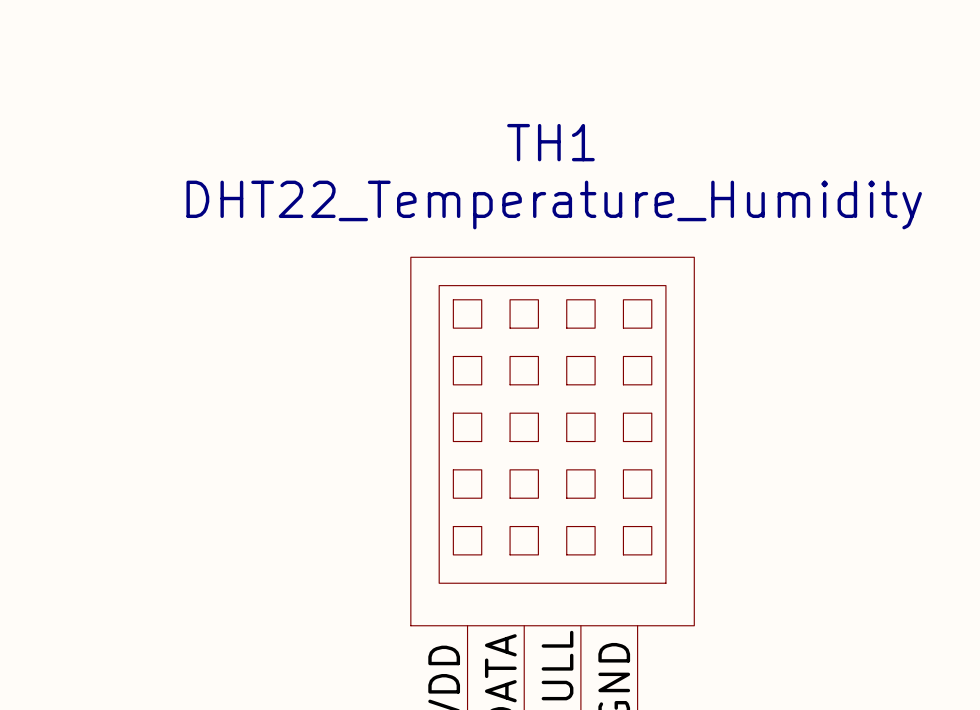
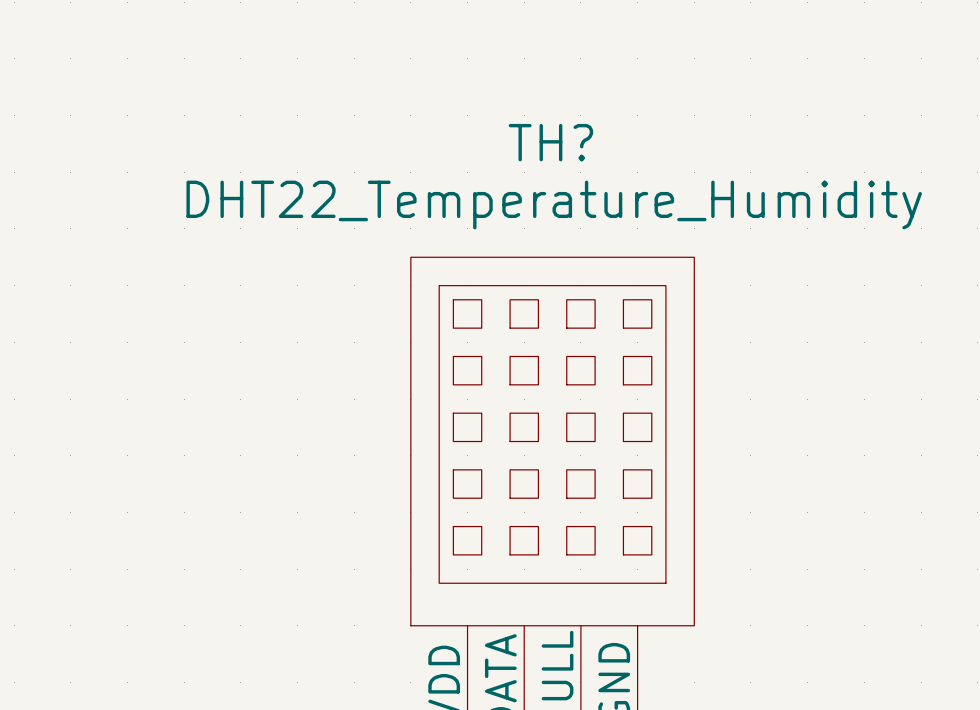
TH1 name: TH1 (550, 142) -> TH? (550, 142)

